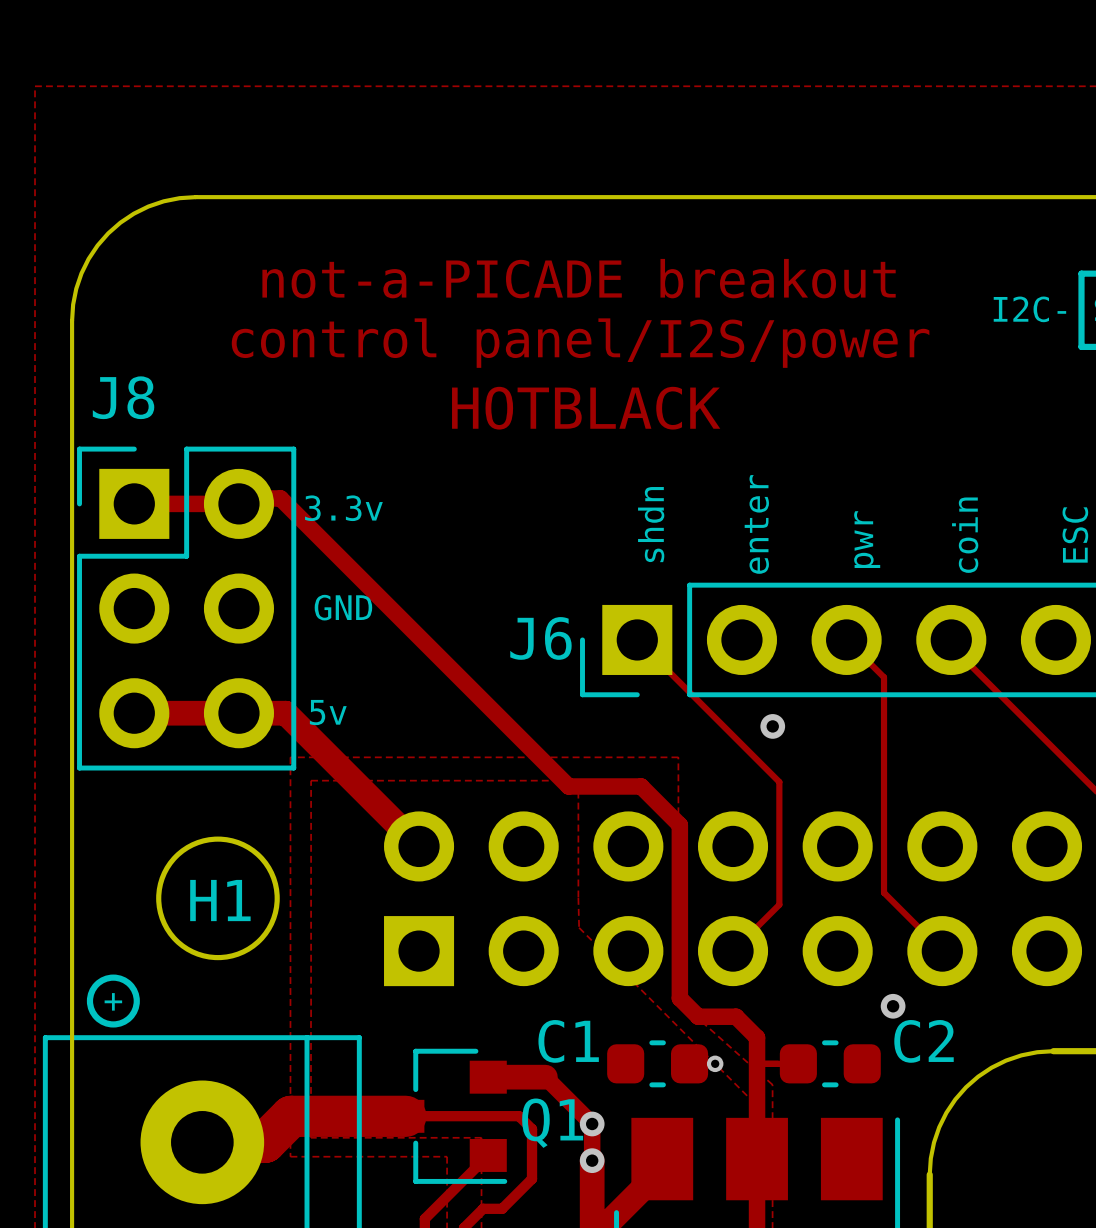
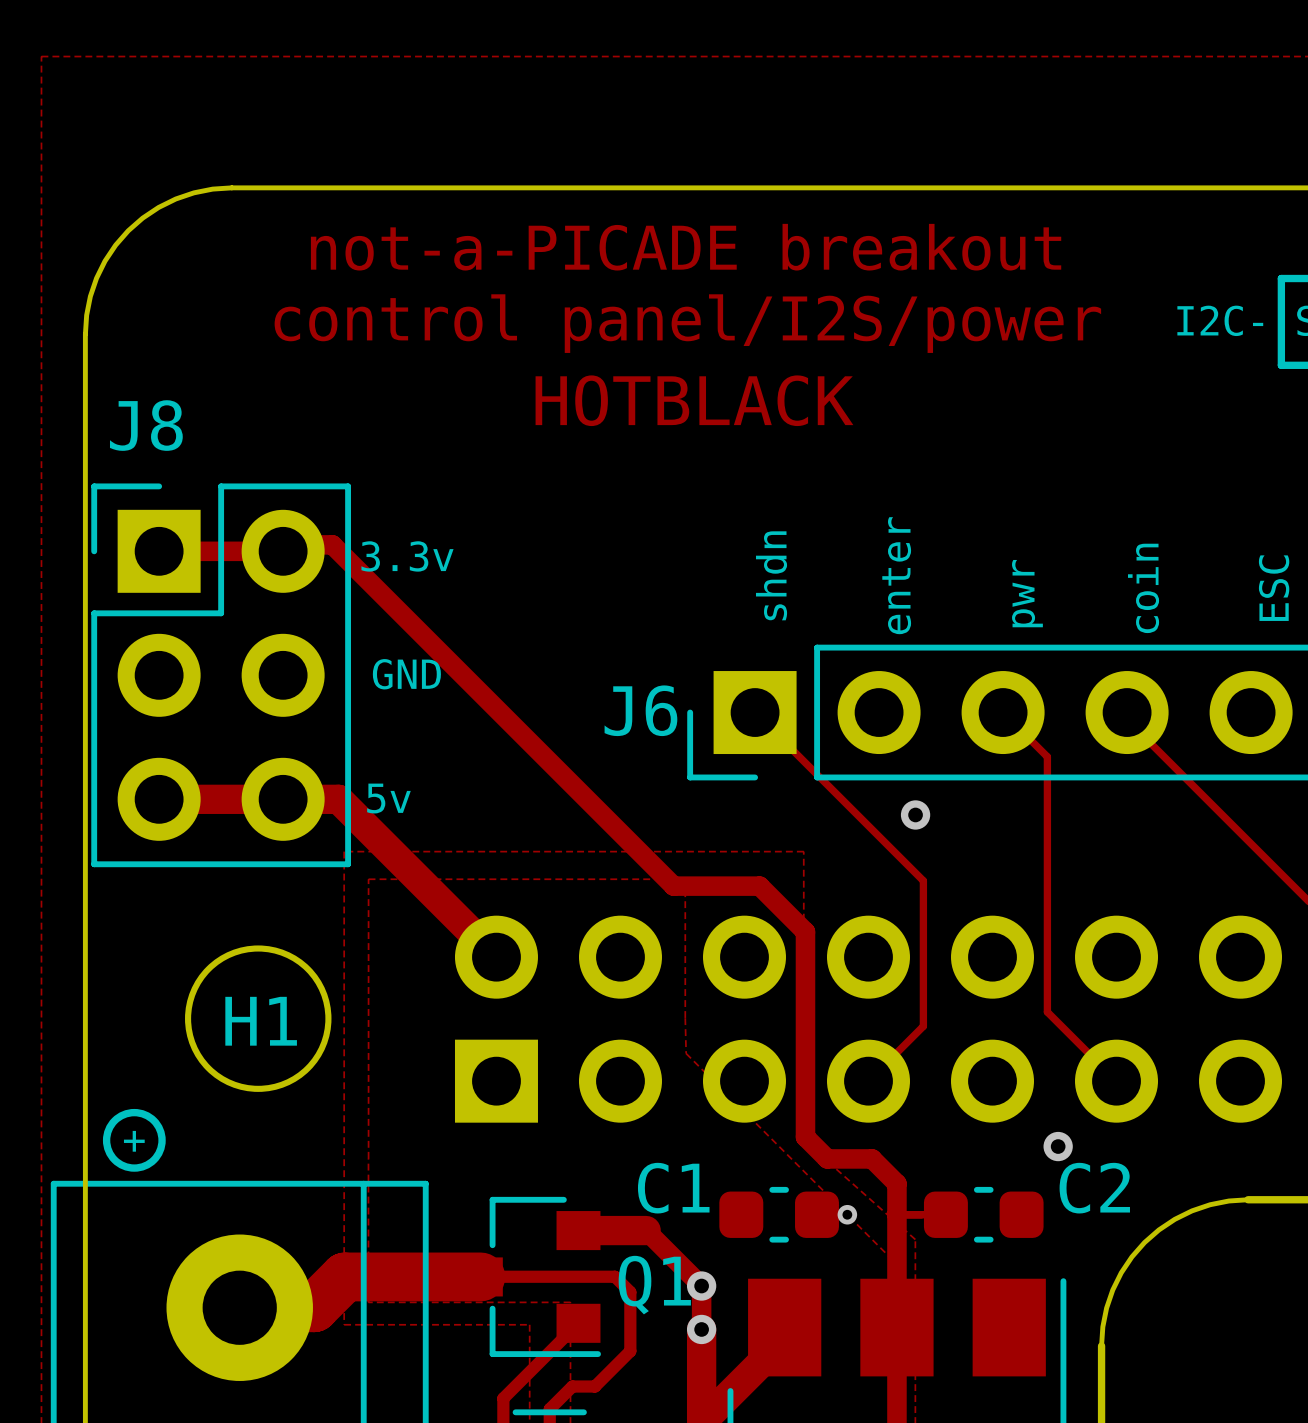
text position: not-a-PICADE breakout (579, 278) -> not-a-PICADE breakout (686, 247)
text position: control panel/I2S/power (580, 343) -> control panel/I2S/power (687, 323)
text position: HOTBLACK (586, 408) -> HOTBLACK (694, 400)

